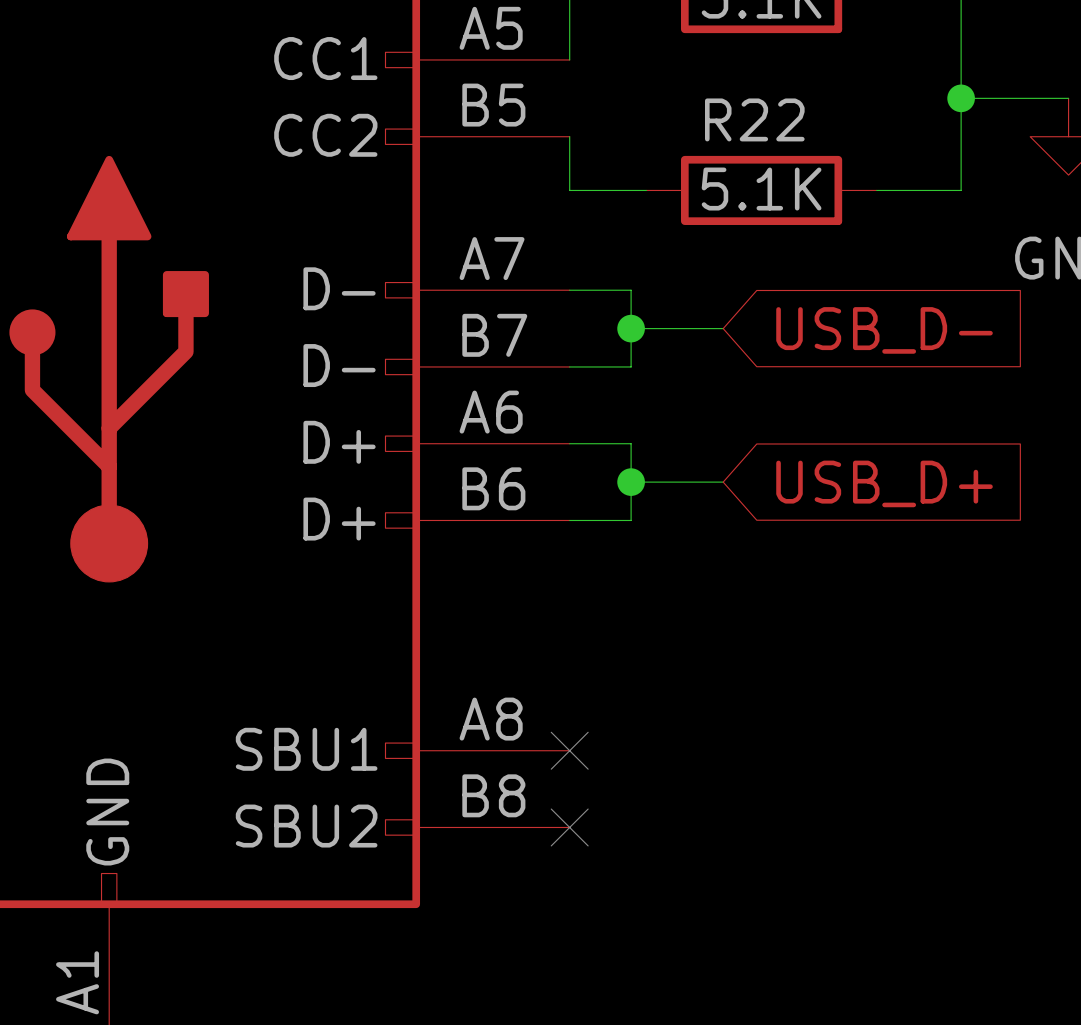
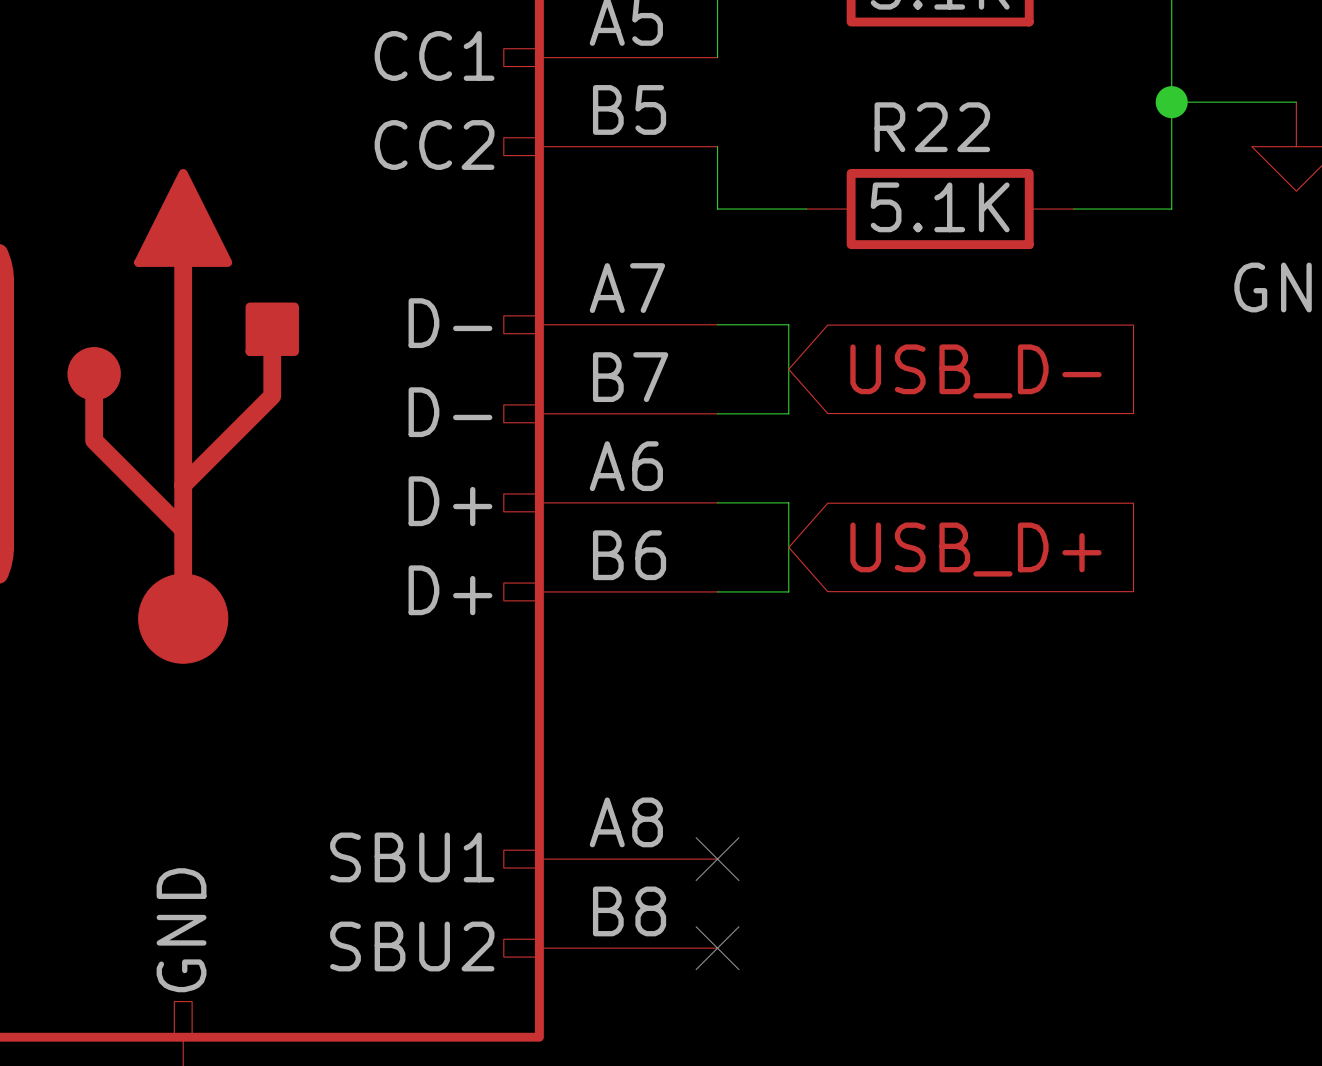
wire: (631, 328) (723, 328) -> none
junction: (631, 328) -> none
global label position: USB_D- (884, 330) -> USB_D- (975, 371)
wire: (631, 482) (723, 482) -> none
junction: (631, 482) -> none
global label position: USB_D+ (884, 483) -> USB_D+ (975, 549)

